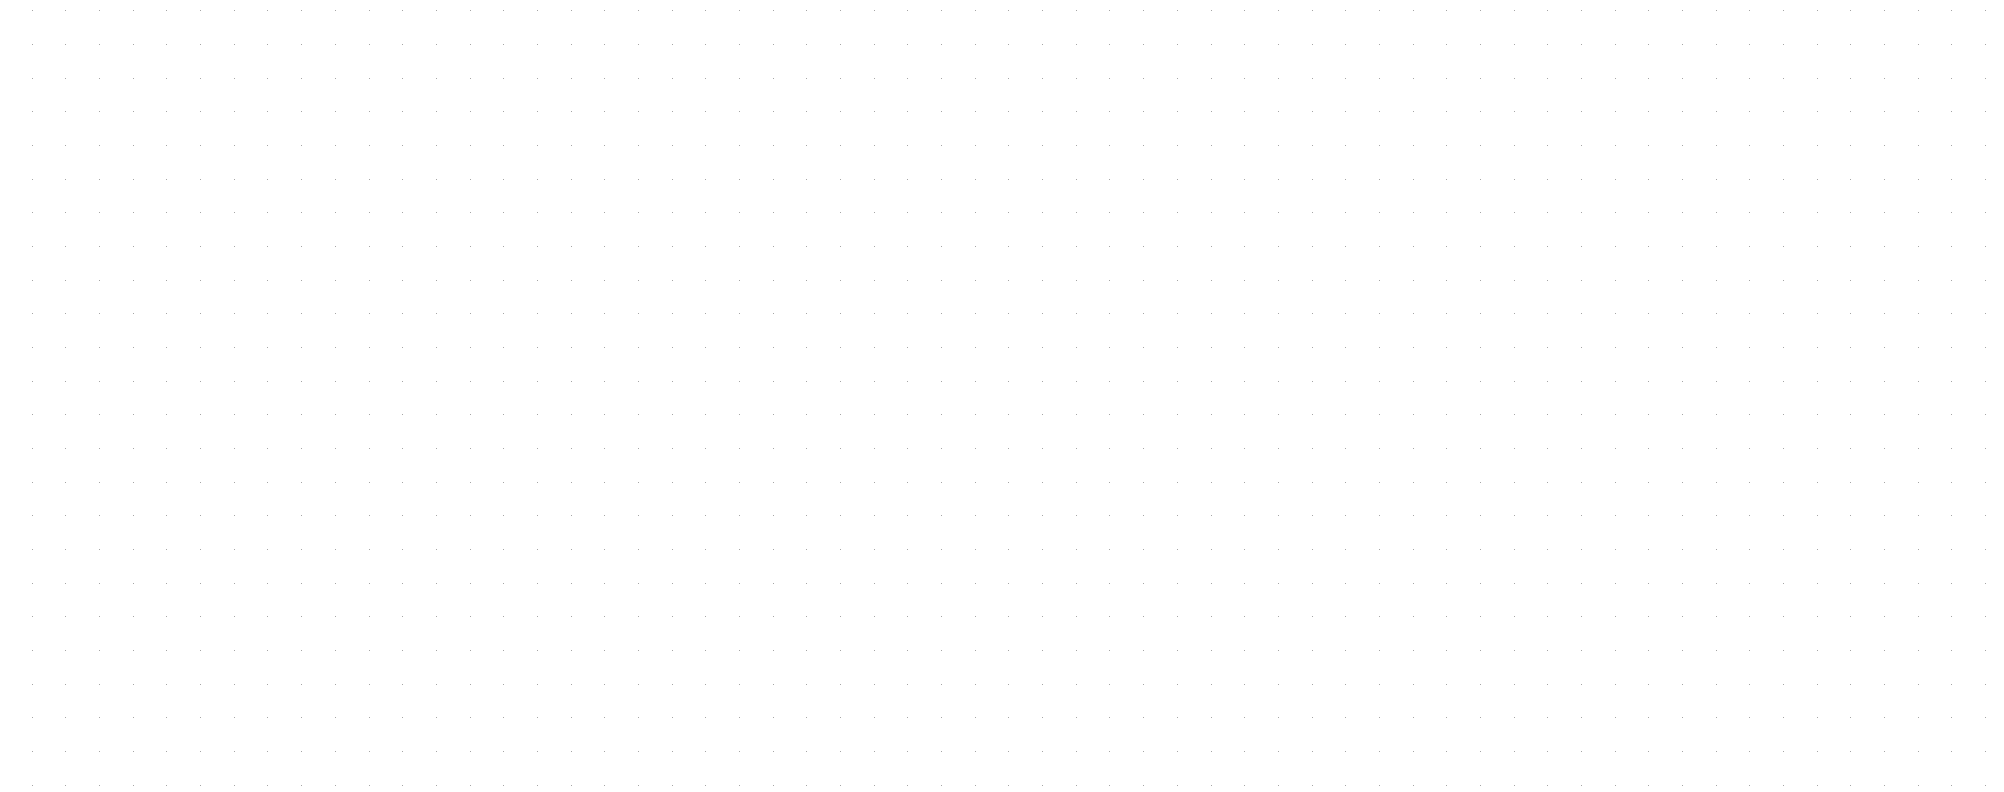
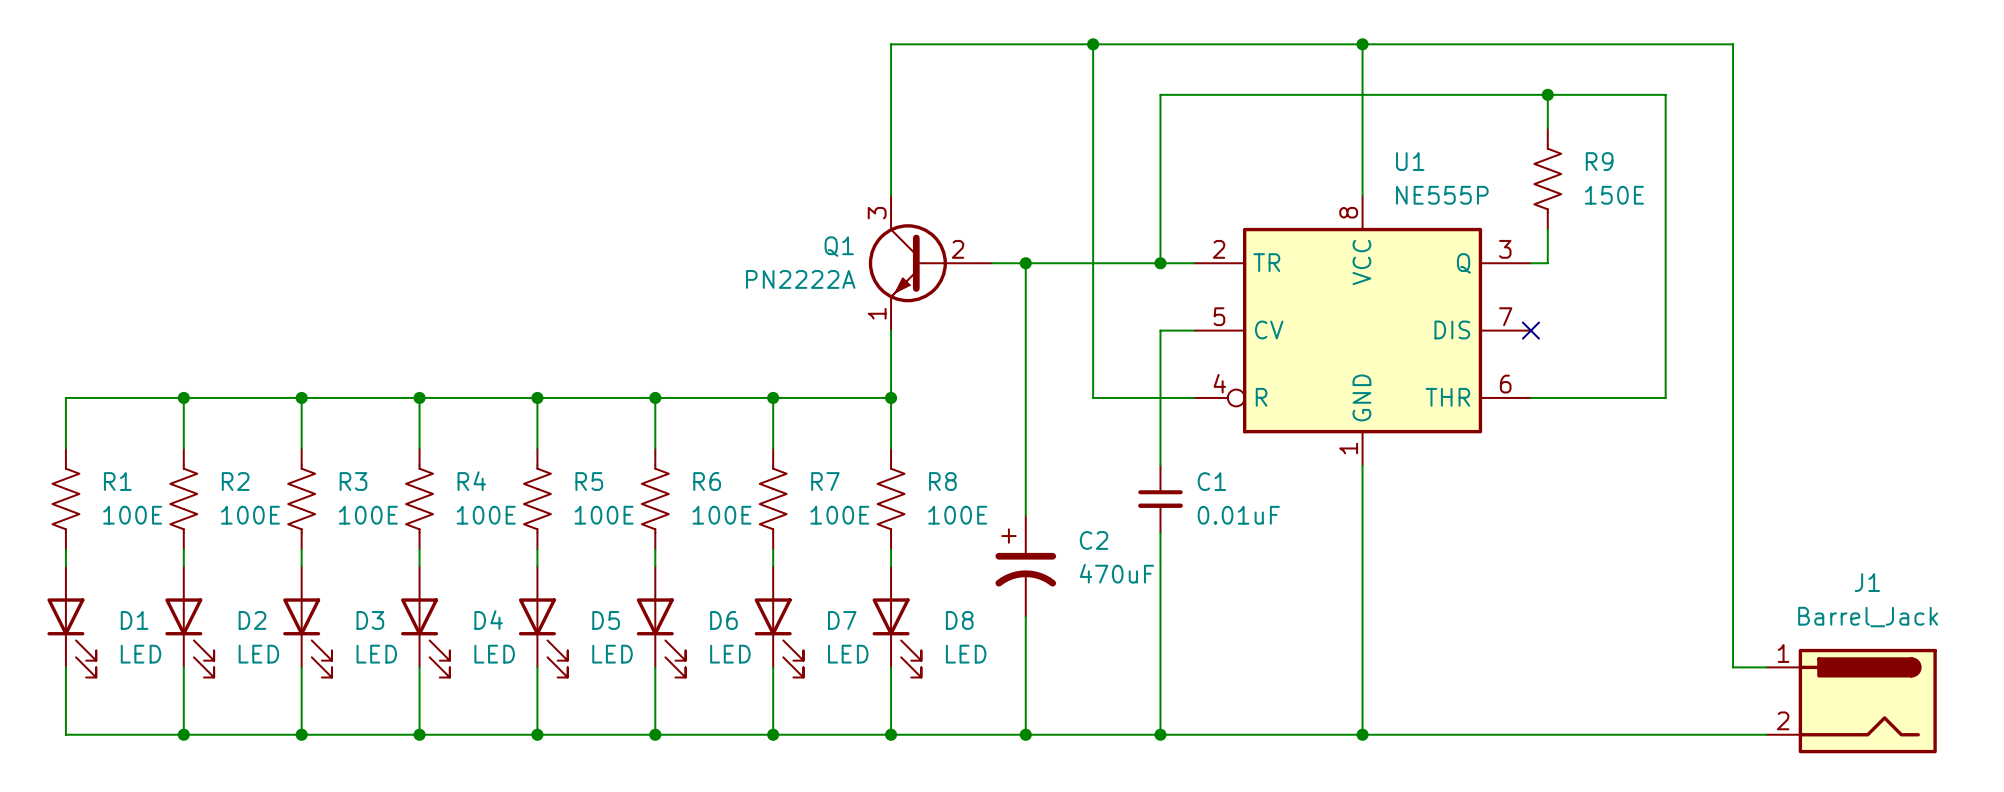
wire: none -> (1093, 44) (1093, 397) (1194, 397)
junction: none -> (1093, 44)
wire: none -> (1362, 44) (1362, 195)
junction: none -> (1362, 44)
wire: none -> (1547, 94) (1547, 128)
junction: none -> (1547, 94)
R9: none -> 150E (1547, 179)
wire: none -> (891, 195) (891, 44) (1733, 44) (1733, 667) (1766, 667)
wire: none -> (1547, 229) (1547, 263) (1530, 263)
Q1: none -> PN2222A (930, 263)
wire: none -> (992, 263) (1194, 263)
wire: none -> (1025, 263) (1025, 515)
junction: none -> (1025, 263)
wire: none -> (1160, 263) (1160, 94) (1665, 94) (1665, 397) (1530, 397)
junction: none -> (1160, 263)
wire: none -> (891, 330) (891, 448)
wire: none -> (1194, 330) (1160, 330) (1160, 465)
U1: none -> NE555P (1362, 330)
no-connect mark: none -> (1530, 330)
wire: none -> (183, 397) (183, 448)
junction: none -> (183, 397)
wire: none -> (301, 397) (301, 448)
junction: none -> (301, 397)
wire: none -> (419, 397) (419, 448)
junction: none -> (419, 397)
wire: none -> (537, 397) (537, 448)
junction: none -> (537, 397)
wire: none -> (655, 397) (655, 448)
junction: none -> (655, 397)
wire: none -> (773, 397) (773, 448)
junction: none -> (773, 397)
wire: none -> (891, 397) (65, 397) (65, 448)
junction: none -> (891, 397)
wire: none -> (1362, 465) (1362, 734)
R1: none -> 100E (65, 498)
R2: none -> 100E (183, 498)
R3: none -> 100E (301, 498)
R4: none -> 100E (419, 498)
R5: none -> 100E (537, 498)
R6: none -> 100E (655, 498)
R7: none -> 100E (773, 498)
R8: none -> 100E (891, 498)
C1: none -> 0.01uF (1160, 498)
wire: none -> (1160, 532) (1160, 734)
wire: none -> (65, 549) (65, 566)
wire: none -> (183, 549) (183, 566)
wire: none -> (301, 549) (301, 566)
wire: none -> (419, 549) (419, 566)
wire: none -> (537, 549) (537, 566)
wire: none -> (655, 549) (655, 566)
wire: none -> (773, 549) (773, 566)
wire: none -> (891, 549) (891, 566)
C2: none -> 470uF (1025, 566)
wire: none -> (1025, 616) (1025, 734)
D1: none -> LED (71, 621)
D2: none -> LED (189, 621)
D3: none -> LED (307, 621)
D4: none -> LED (425, 621)
D5: none -> LED (543, 621)
D6: none -> LED (661, 621)
D7: none -> LED (779, 621)
D8: none -> LED (896, 621)
wire: none -> (65, 667) (65, 734) (1766, 734)
wire: none -> (183, 667) (183, 734)
wire: none -> (301, 667) (301, 734)
wire: none -> (419, 667) (419, 734)
wire: none -> (537, 667) (537, 734)
wire: none -> (655, 667) (655, 734)
wire: none -> (773, 667) (773, 734)
wire: none -> (891, 667) (891, 734)
J1: none -> Barrel_Jack (1851, 701)
junction: none -> (183, 734)
junction: none -> (301, 734)
junction: none -> (419, 734)
junction: none -> (537, 734)
junction: none -> (655, 734)
junction: none -> (773, 734)
junction: none -> (891, 734)
junction: none -> (1025, 734)
junction: none -> (1160, 734)
junction: none -> (1362, 734)

